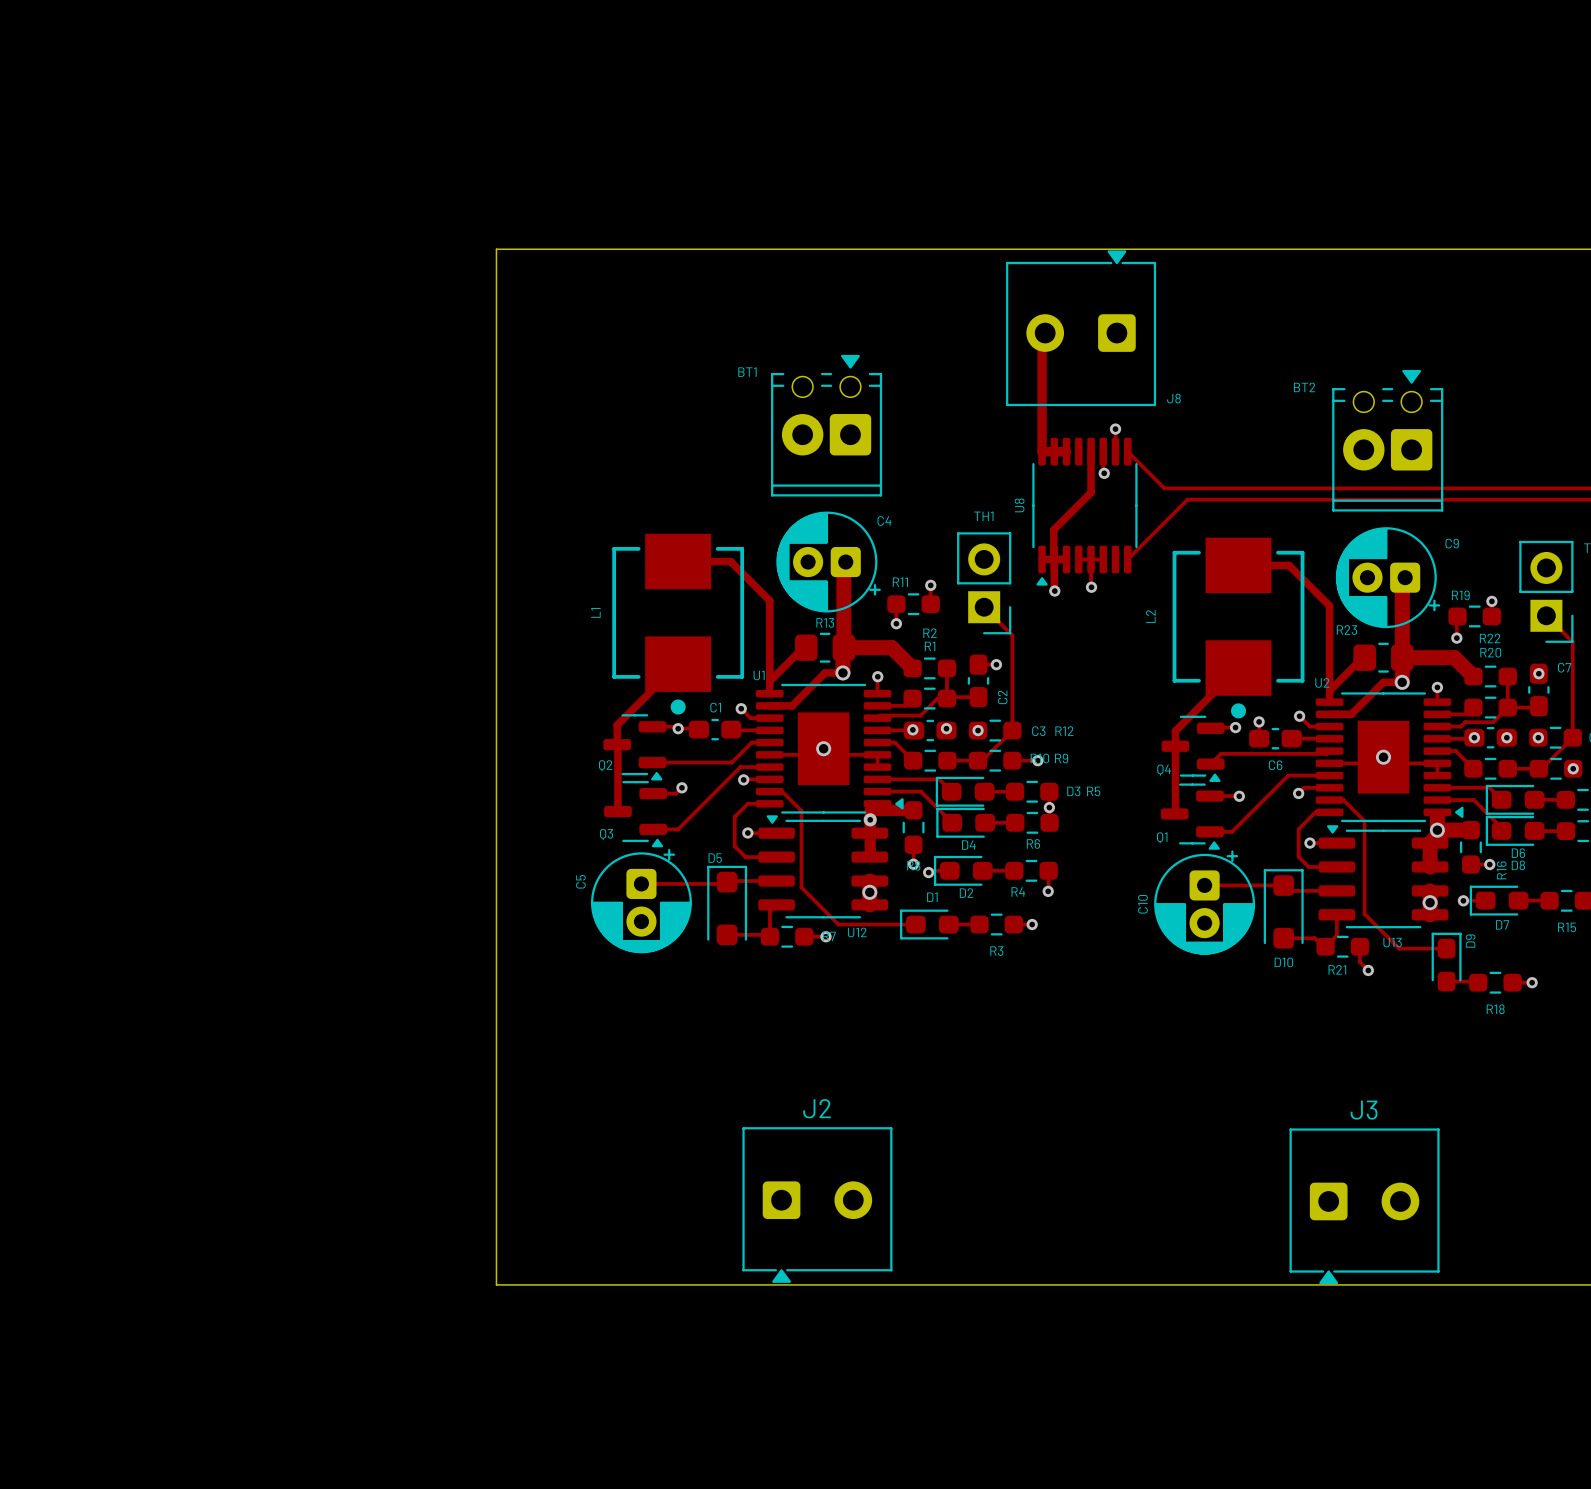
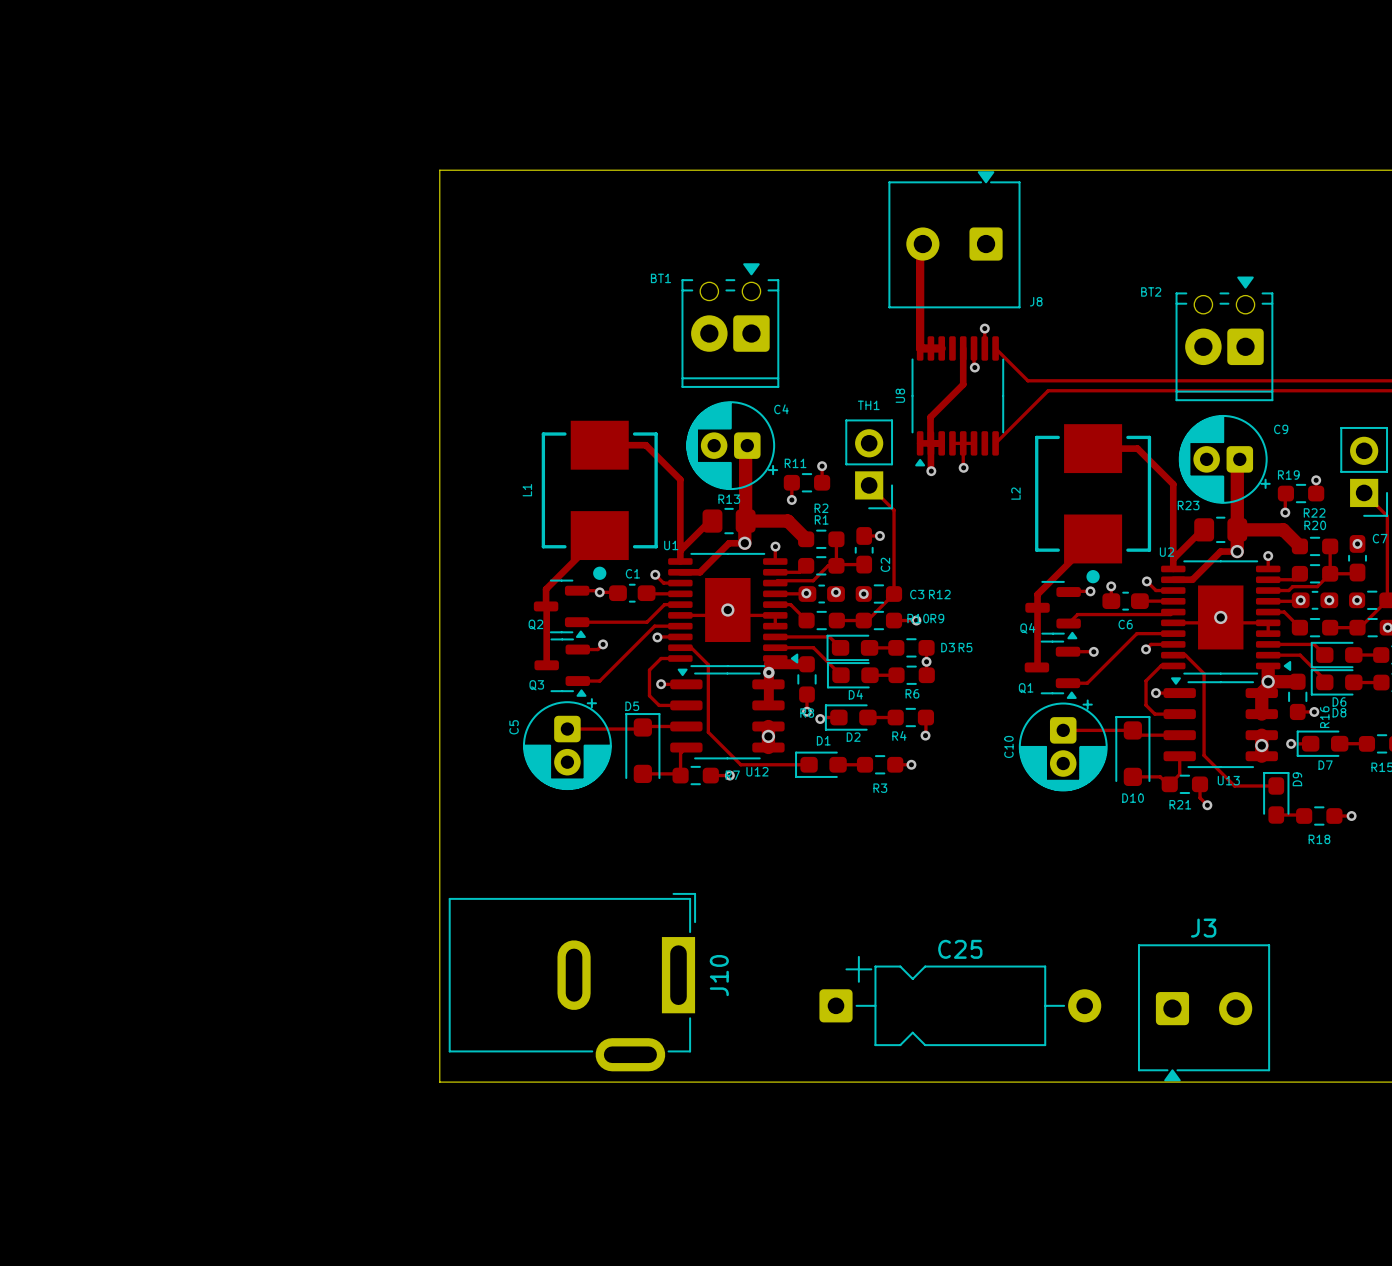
J10: none -> (572, 982)
C25: none -> (960, 1001)
J2: (817, 1205) -> none

